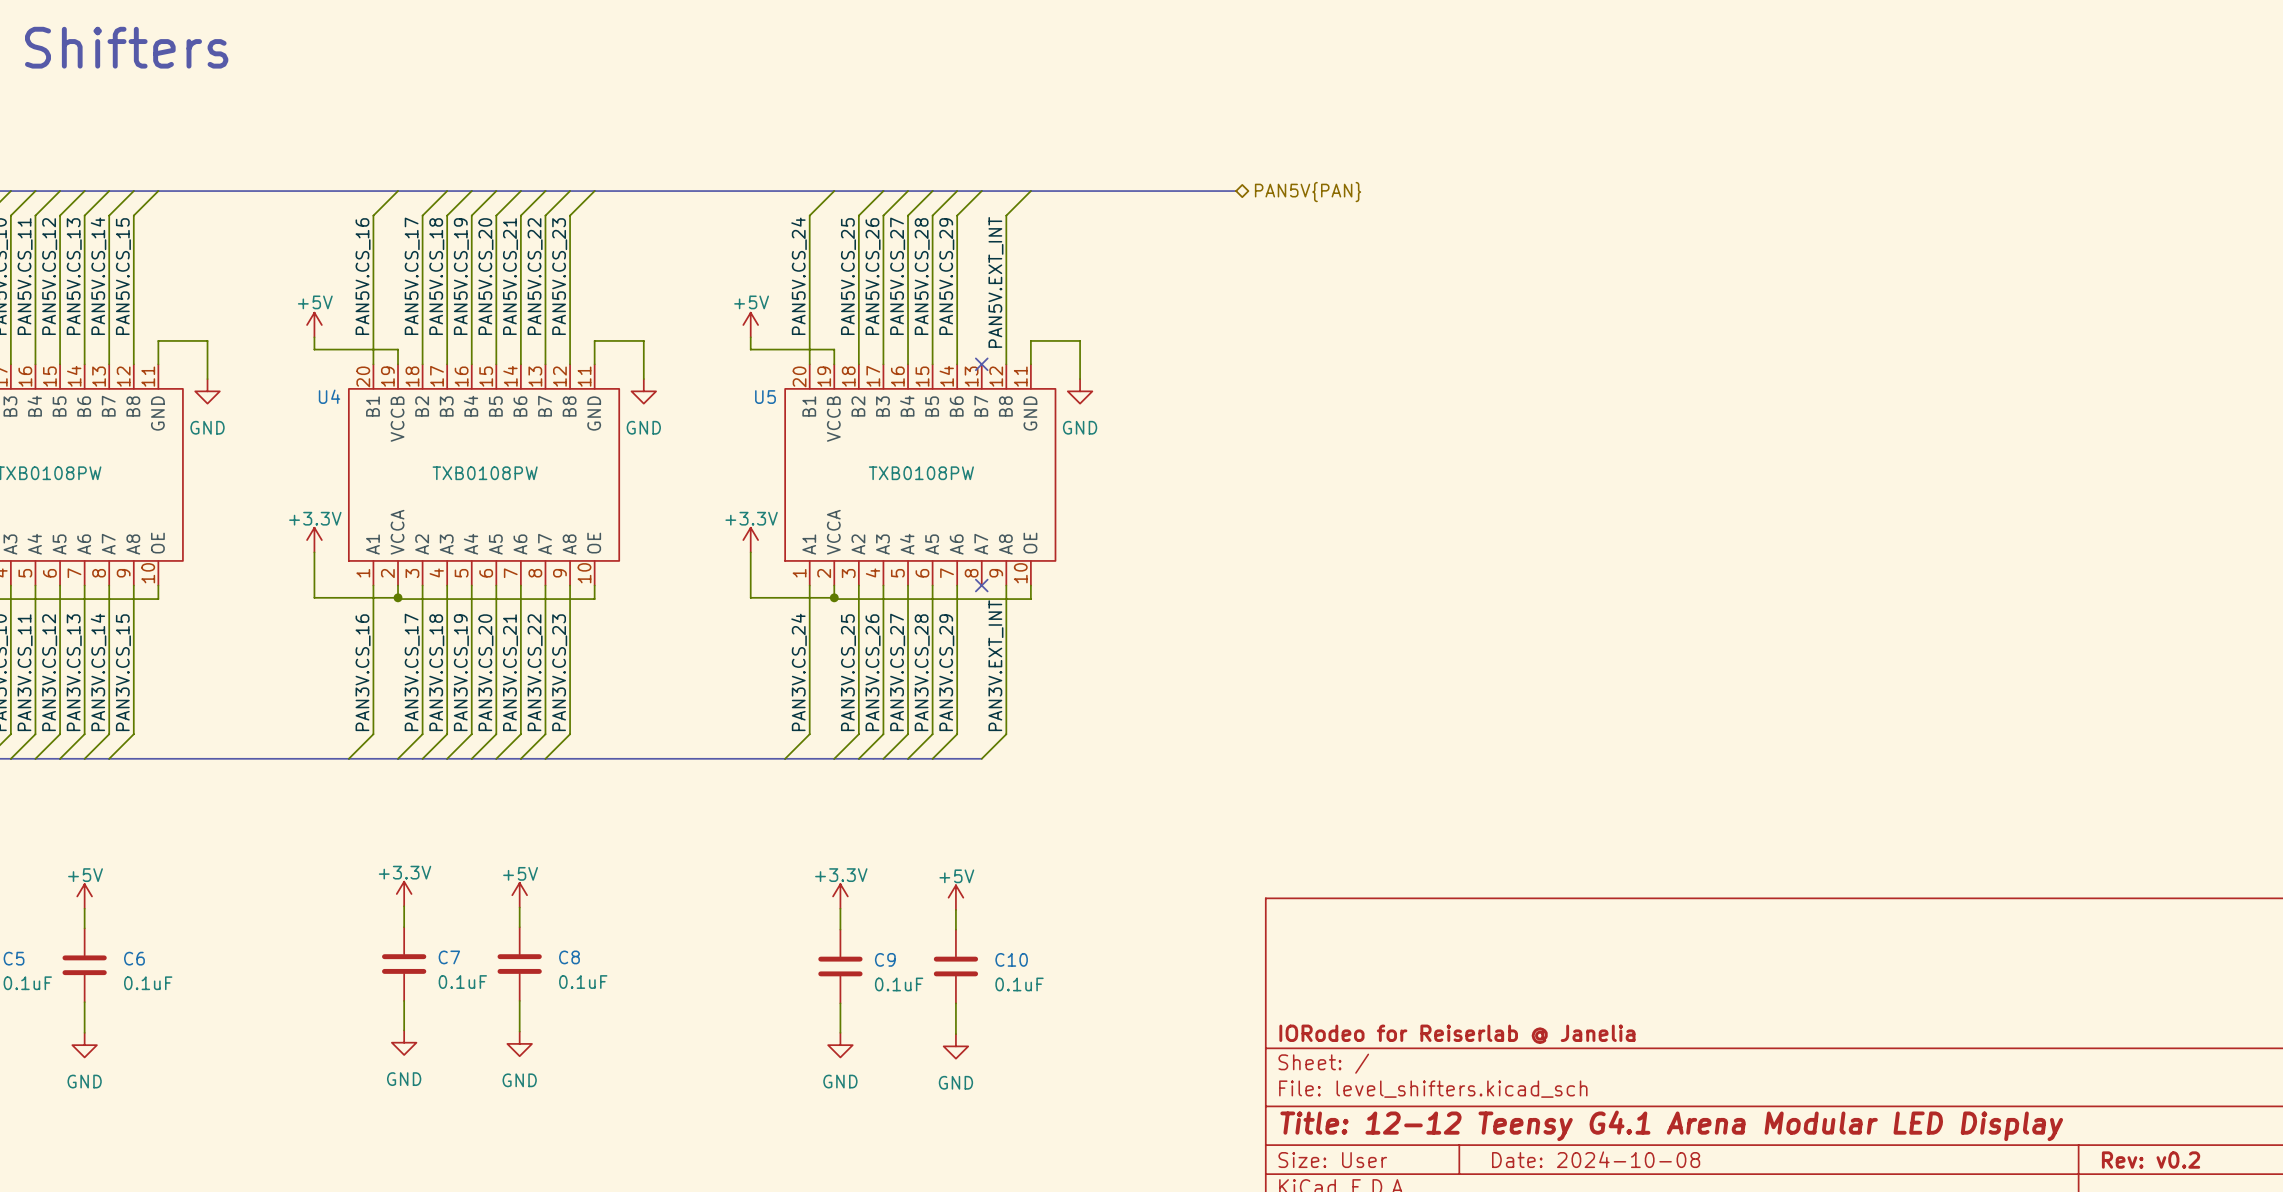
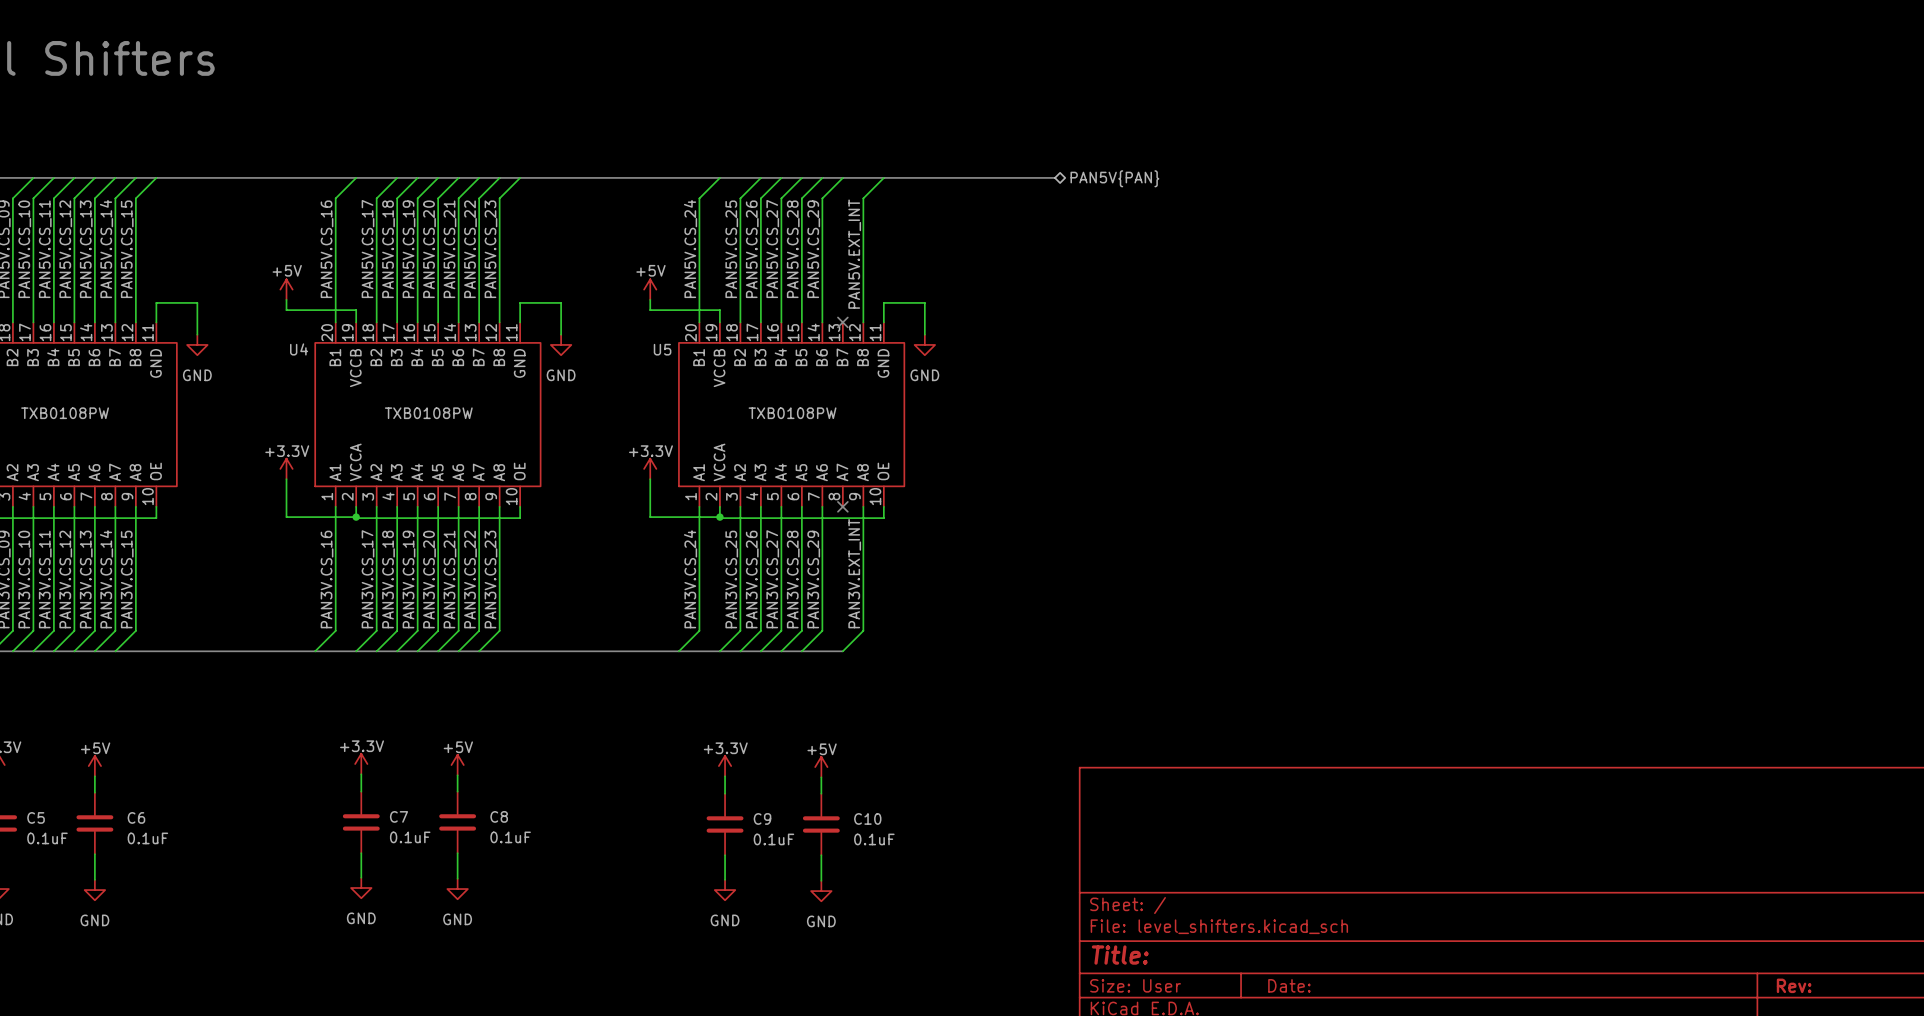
title block: IORodeo for Reiserlab @ Janelia (1457, 1034) -> none
title block: Title: 12-12 Teensy G4.1 Arena Modular LED Display (1671, 1125) -> Title: (1120, 955)
title block: Date: 2024-10-08 (1596, 1159) -> Date: (1289, 985)
title block: Rev: v0.2 (2151, 1160) -> Rev: (1794, 985)

